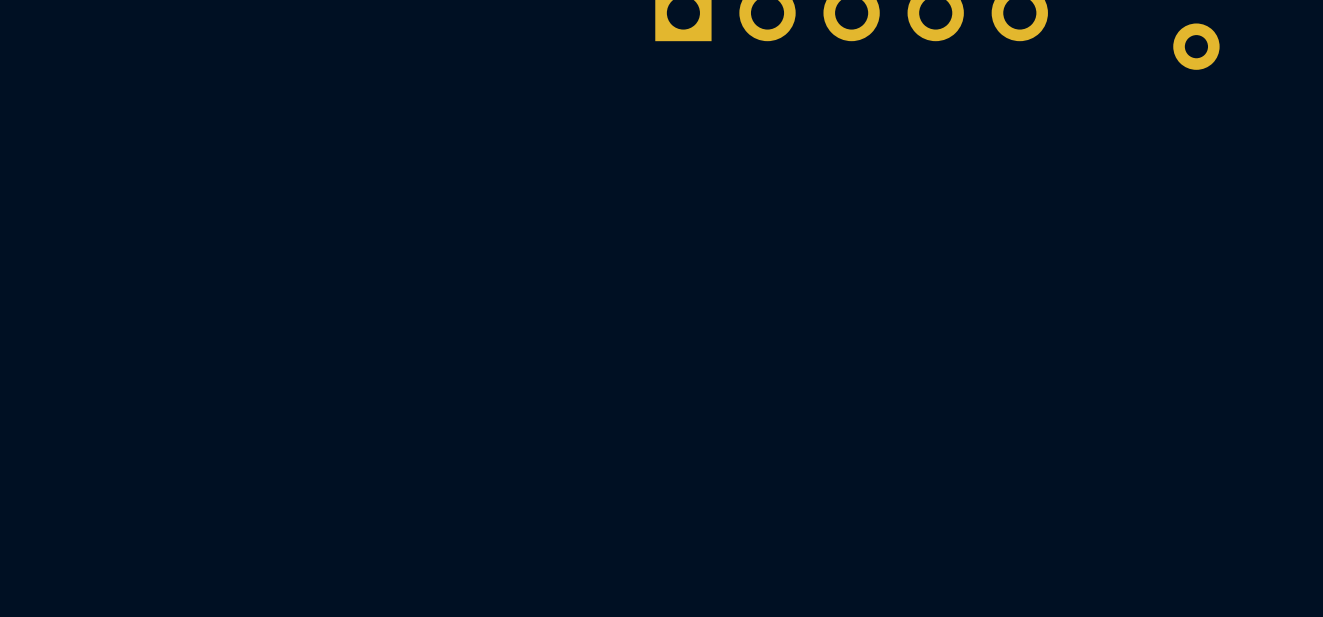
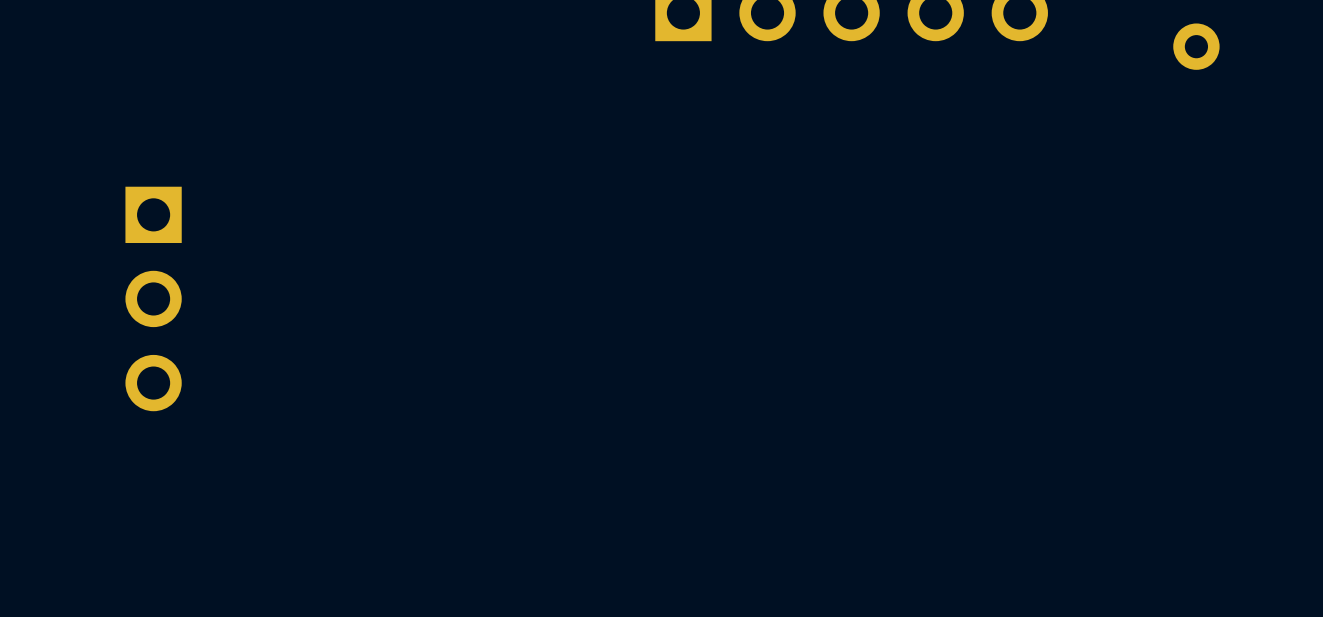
part: none -> (153, 298)

